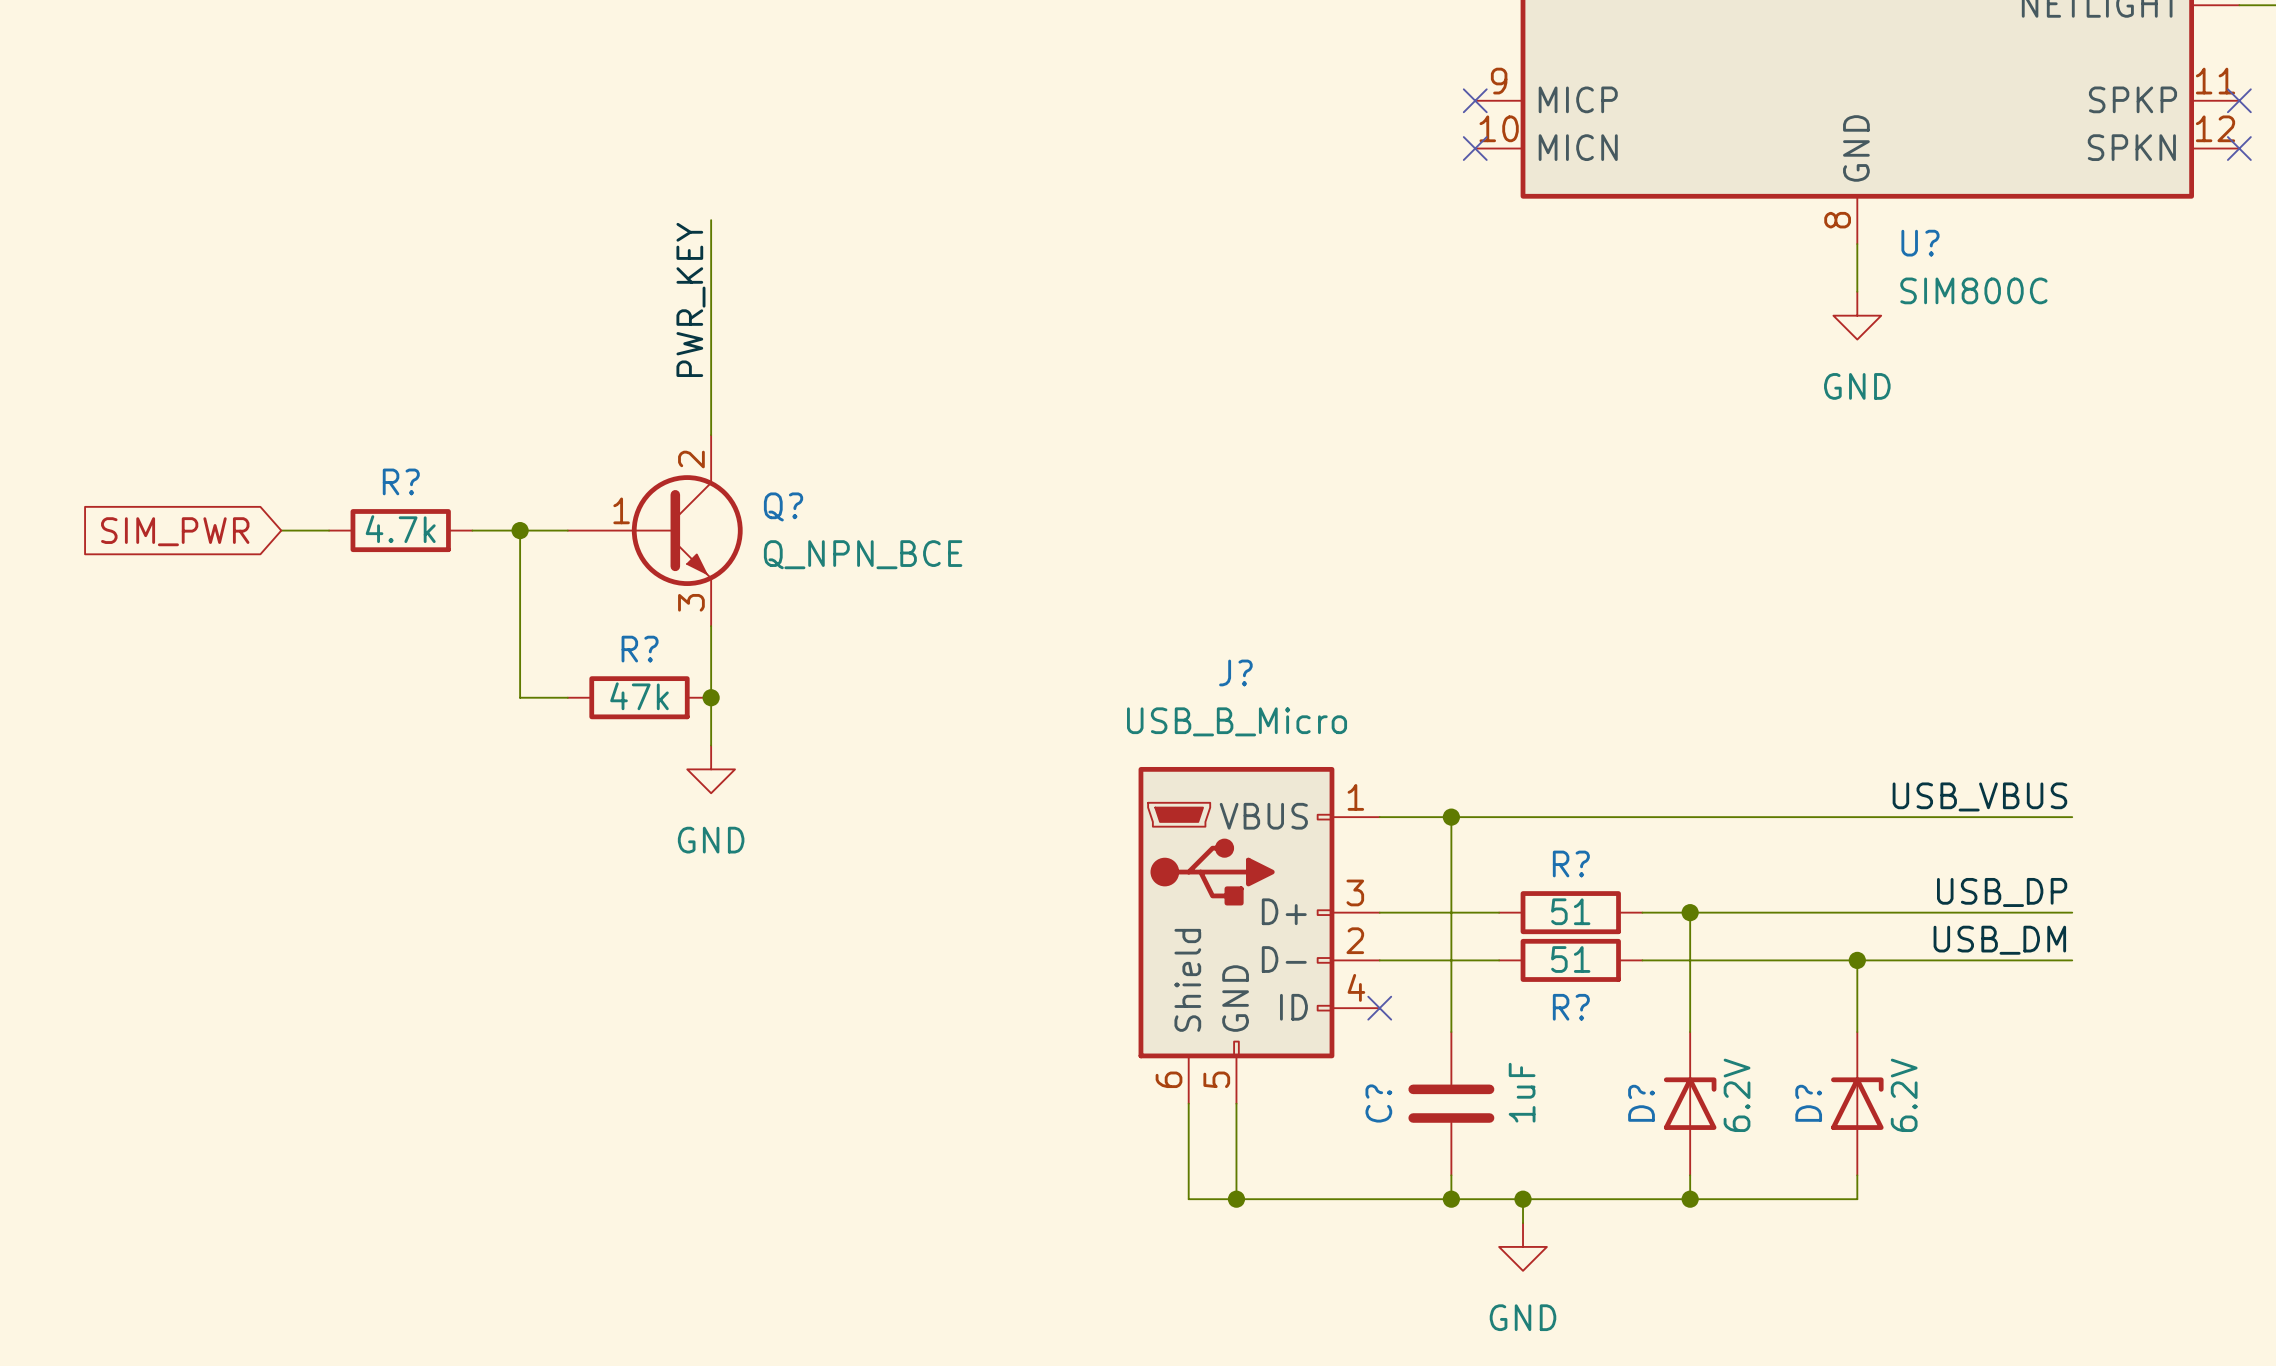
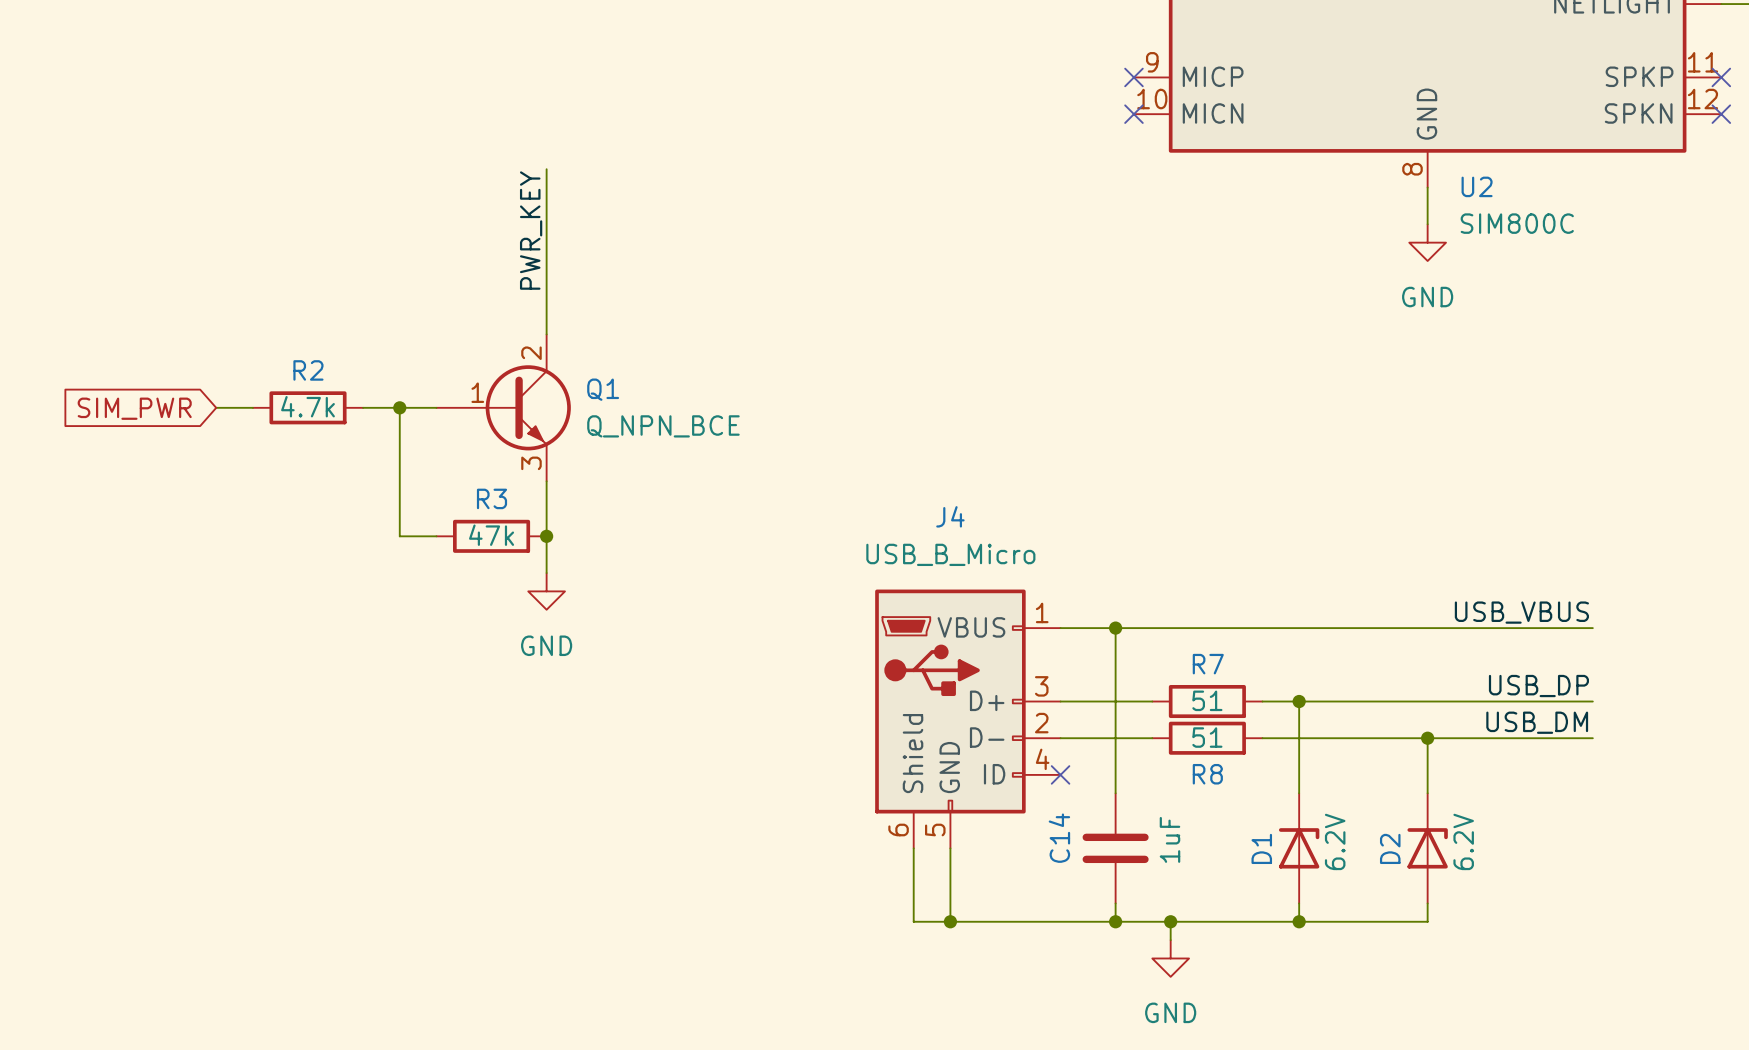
U? name: U? (1920, 243) -> U2 (1477, 186)
R? name: R? (401, 481) -> R2 (308, 370)
Q? name: Q? (783, 506) -> Q1 (603, 389)
R? name: R? (640, 649) -> R3 (491, 498)
J? name: J? (1235, 672) -> J4 (950, 516)
R? name: R? (1571, 863) -> R7 (1208, 664)
R? name: R? (1571, 1007) -> R8 (1207, 774)
C? name: C? (1378, 1103) -> C14 (1059, 838)
D? name: D? (1641, 1103) -> D1 (1261, 848)
D? name: D? (1808, 1103) -> D2 (1390, 848)

